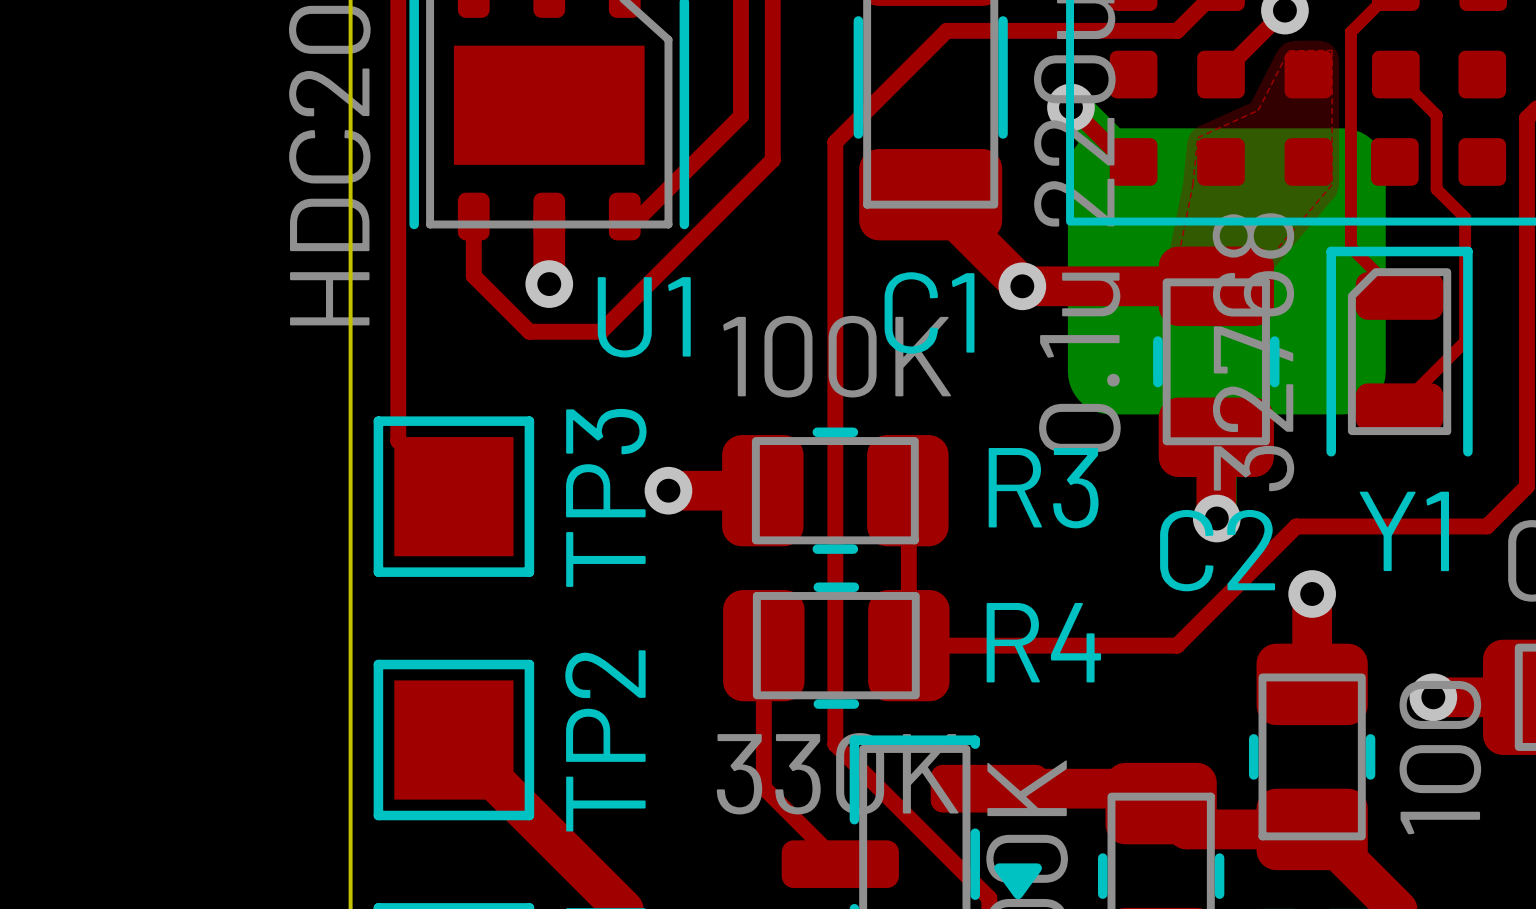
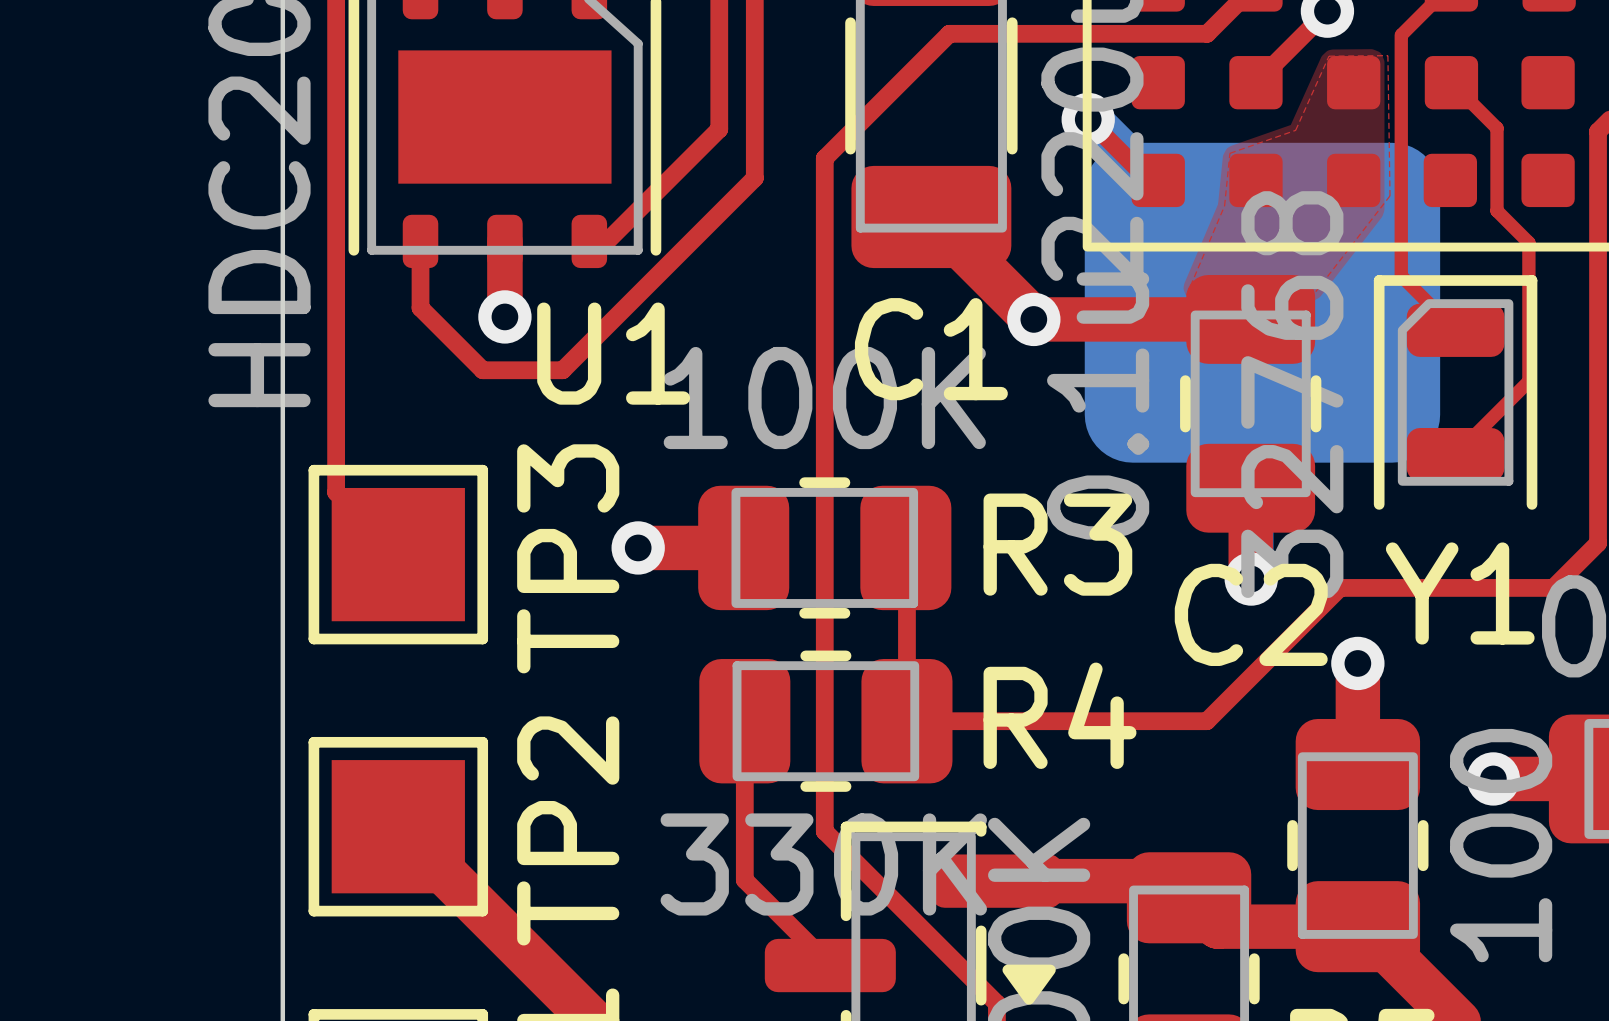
top zone outline: (1197, 137) (1258, 110) (1288, 50) (1332, 50) (1332, 184) (1234, 299) (1177, 264) (1192, 184) -> (1229, 153) (1295, 130) (1328, 56) (1387, 55) (1390, 195) (1313, 294) (1186, 294) (1224, 205)

